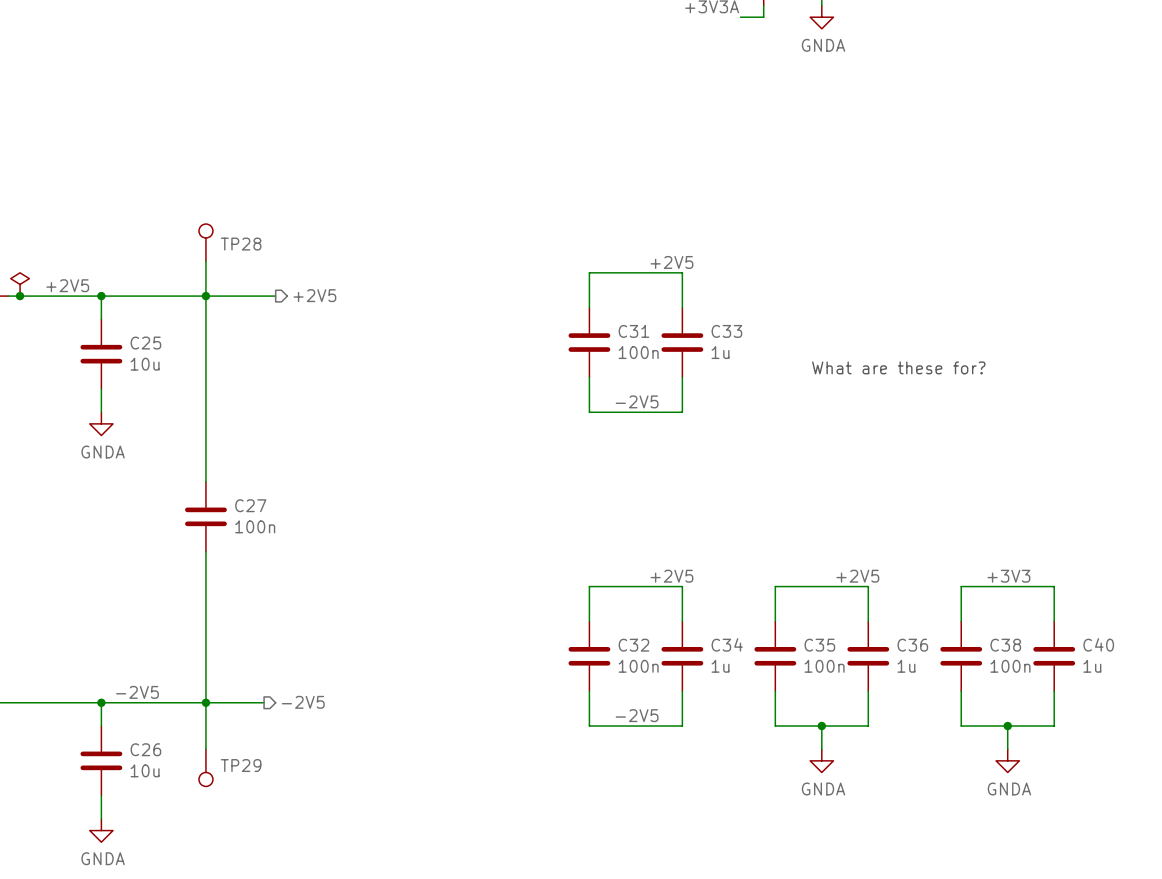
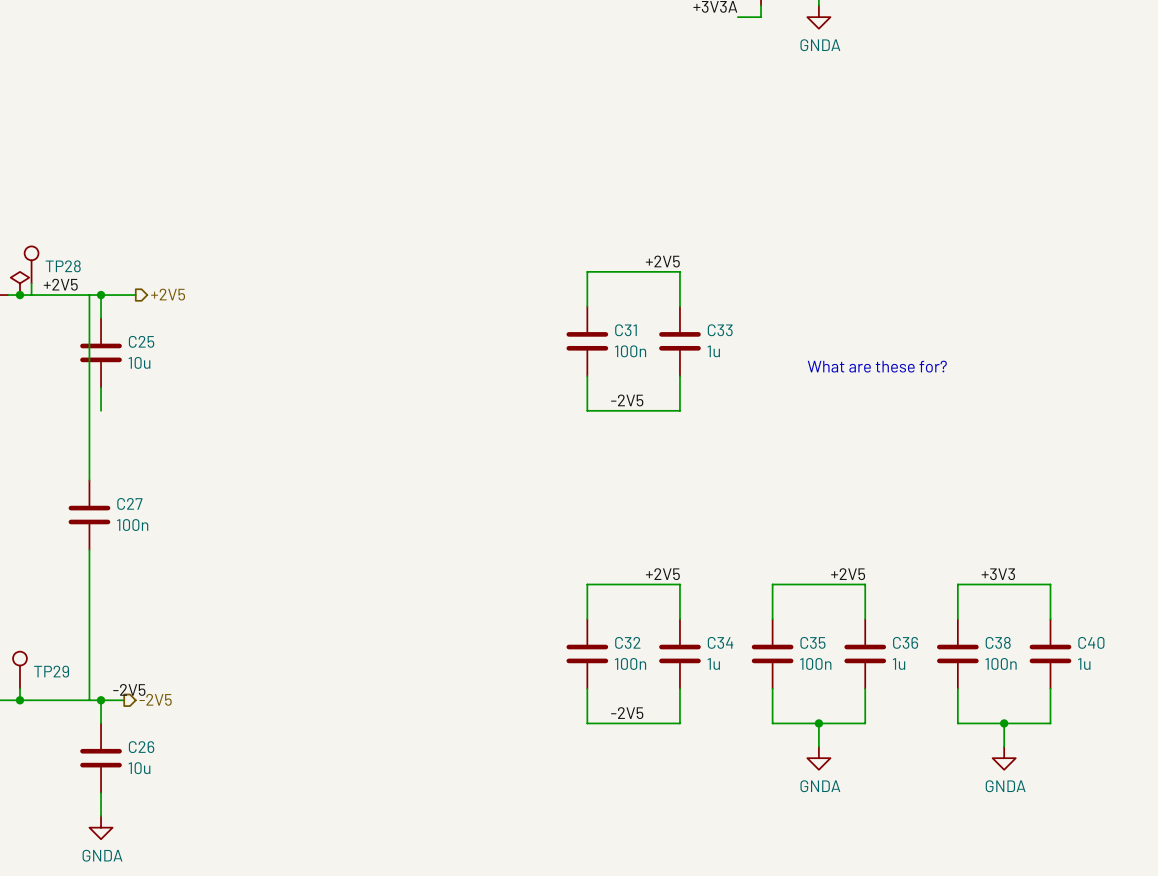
TP28 position: (205, 242) -> (31, 264)
wire: (205, 261) (205, 481) -> none
wire: none -> (31, 283) (31, 295)
hierarchical label position: +2V5 (314, 295) -> +2V5 (168, 294)
wire: none -> (89, 295) (89, 480)
wire: (136, 296) (275, 296) -> none
junction: (205, 296) -> none
power symbol: GNDA (101, 423) -> none
C27 position: (205, 516) -> (89, 515)
wire: none -> (89, 549) (89, 700)
wire: (205, 551) (205, 749) -> none
wire: none -> (19, 688) (19, 700)
junction: none -> (19, 700)
wire: (124, 702) (264, 702) -> none
junction: (205, 702) -> none
hierarchical label position: -2V5 (303, 702) -> -2V5 (155, 699)
TP29 position: (205, 767) -> (19, 670)
TP29 rotation: 0° (205, 779) -> 180° (19, 658)

